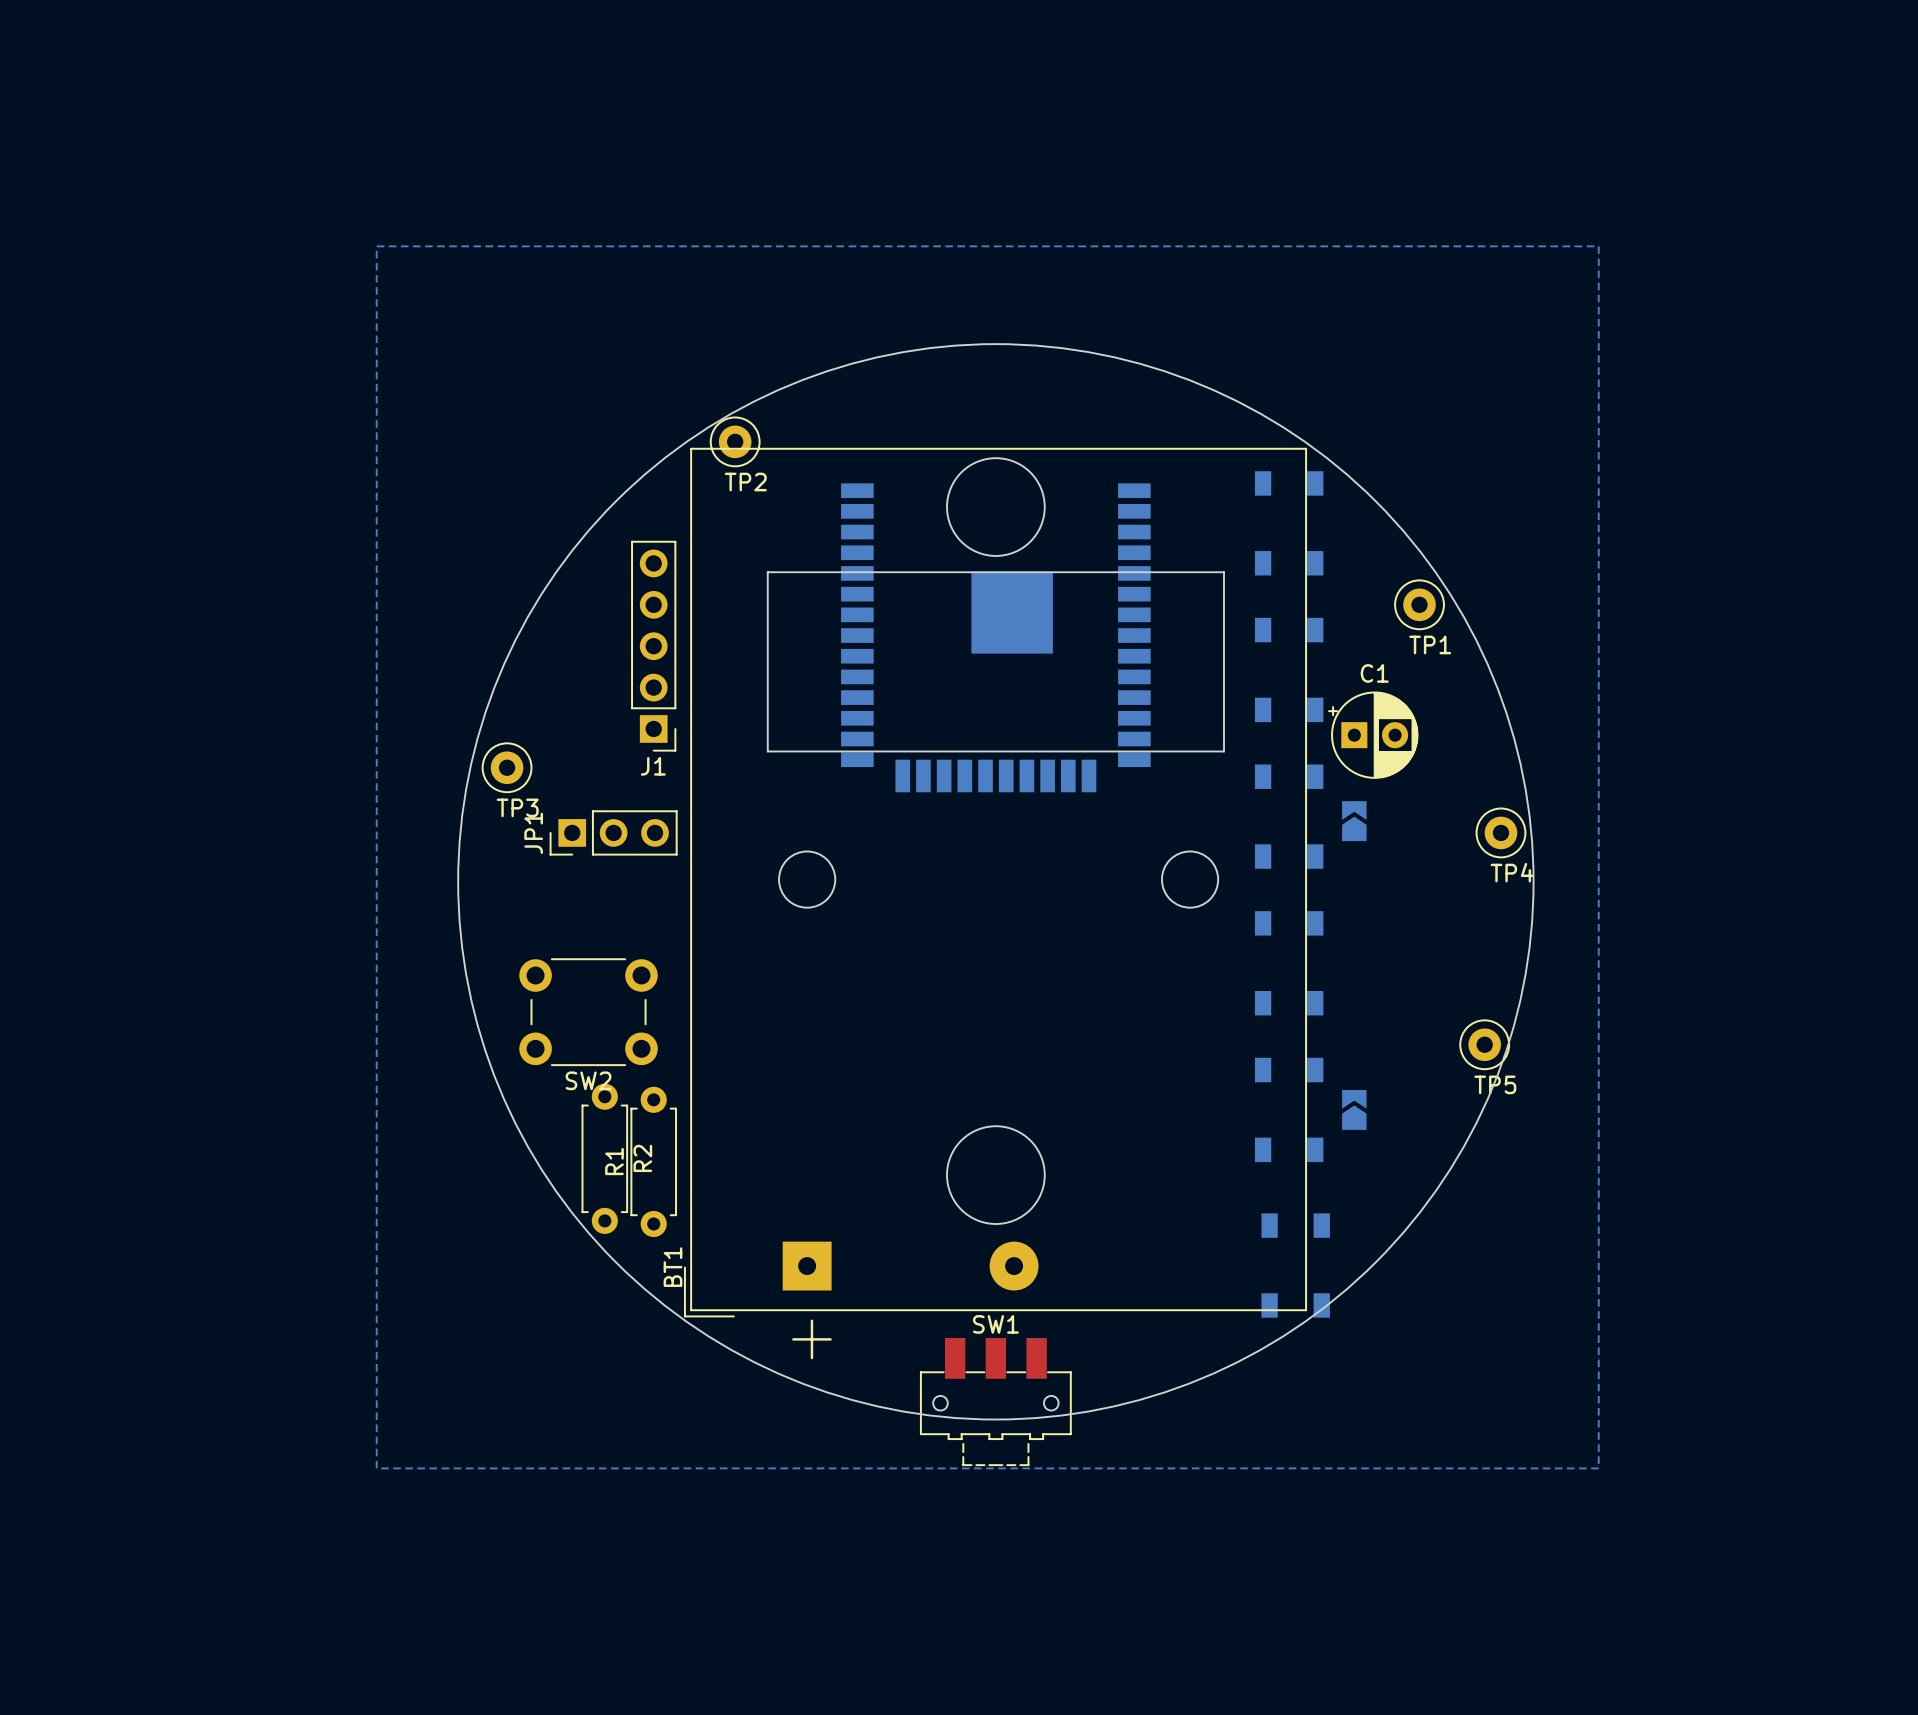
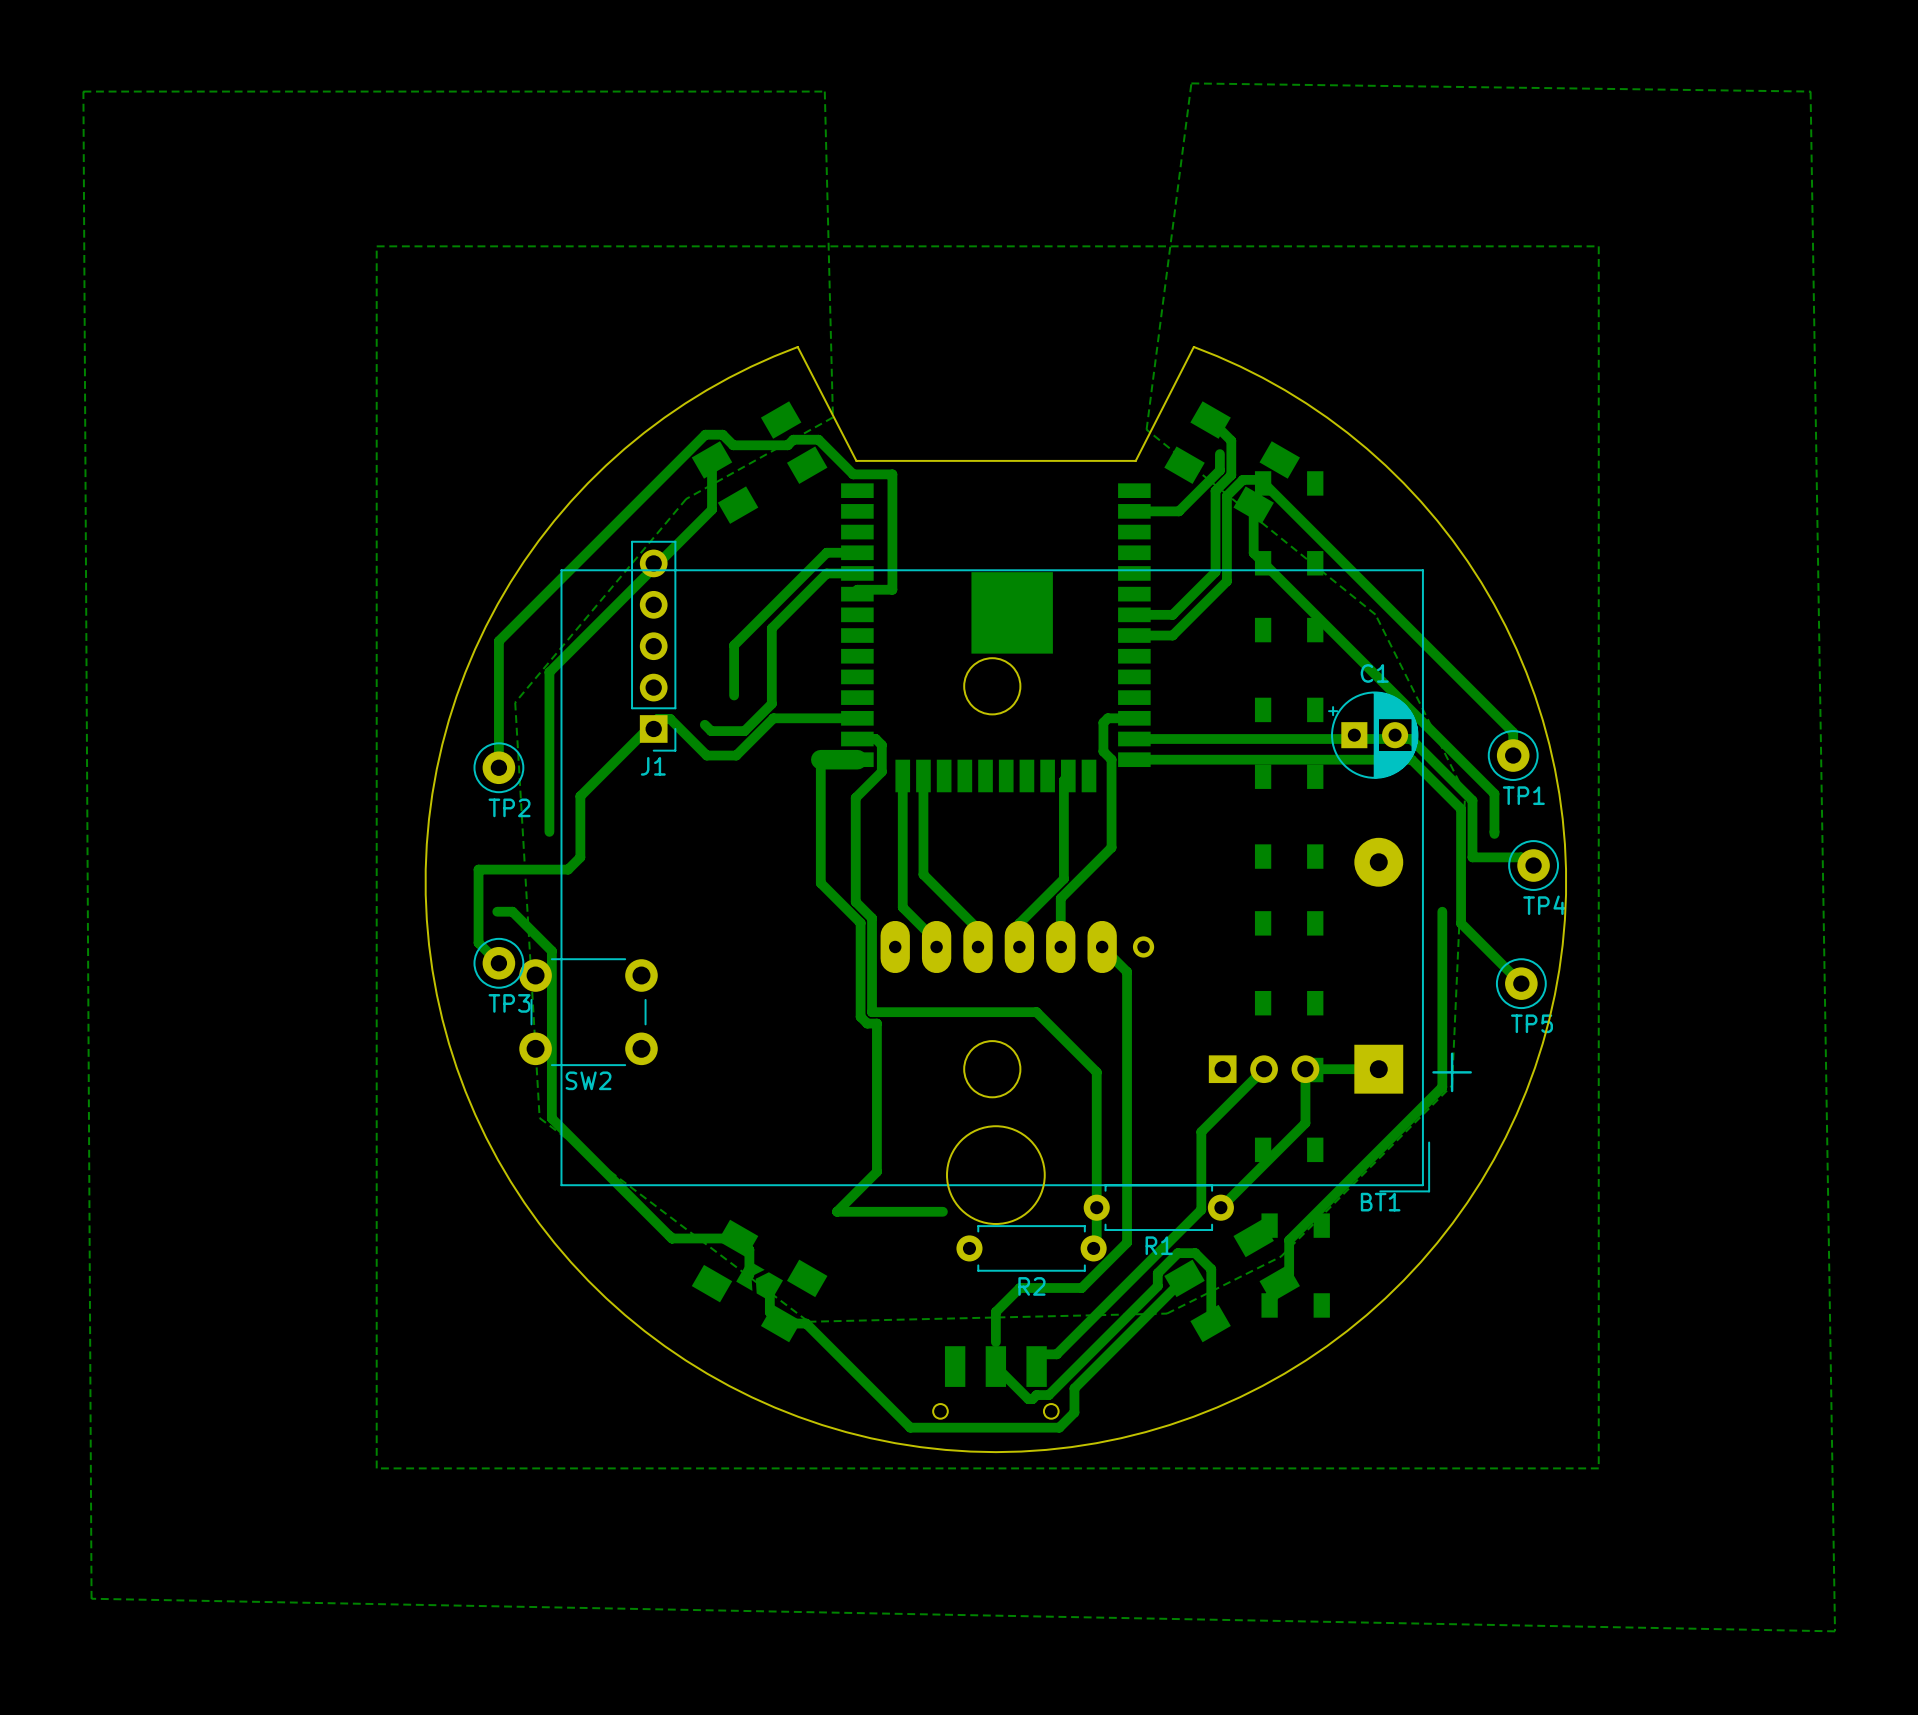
bottom zone outline: none -> (1191, 83) (1146, 429) (1375, 614) (1465, 793) (1452, 1085) (1281, 1256) (1166, 1313) (808, 1321) (539, 1118) (515, 702) (686, 498) (832, 417) (824, 91) (83, 91) (91, 1598) (1835, 1631) (1810, 91) (1191, 83)
round board edge: [457, 343, 1535, 1421] -> none
board edge: none -> (1193, 346) (1135, 460) (856, 460) (797, 347) (774, 356) (706, 390) (664, 417) (624, 448) (587, 483) (554, 520) (510, 582) (485, 626) (465, 672) (448, 720) (436, 769) (426, 844) (425, 894) (429, 945) (436, 994) (456, 1067) (475, 1114) (510, 1181) (539, 1223) (571, 1262) (606, 1298) (644, 1331) (707, 1373) (751, 1397) (798, 1416) (870, 1438) (920, 1447) (970, 1451) (1021, 1451) (1096, 1443) (1145, 1432) (1193, 1416) (1240, 1397) (1284, 1373) (1326, 1346) (1366, 1315) (1420, 1262) (1452, 1223) (1481, 1181) (1505, 1137) (1535, 1067) (1549, 1019) (1562, 944) (1566, 894) (1564, 844) (1554, 769) (1542, 720) (1526, 672) (1505, 626) (1481, 582) (1452, 540) (1420, 501) (1385, 465) (1327, 417) (1284, 390) (1240, 366) (1193, 346)
bottom track: none -> (1210, 420) (1231, 440) (1231, 475) (1215, 490) (1215, 571) (1172, 614) (1134, 614)
TP2 position: (735, 441) -> (498, 767)
bottom track: none -> (1219, 454) (1219, 470) (1178, 511) (1134, 511)
round board edge: [946, 457, 1046, 557] -> none
bottom track: none -> (712, 459) (712, 509) (549, 672) (549, 831)
part: none -> (759, 462)
part: none -> (1232, 462)
bottom track: none -> (1253, 505) (1253, 553) (1494, 793) (1494, 833)
bottom track: none -> (857, 552) (826, 552) (734, 645) (734, 695)
board edge: (767, 572) (1223, 572) (1223, 751) (767, 751) (767, 572) -> none
bottom track: none -> (857, 573) (826, 573) (771, 628) (771, 703) (744, 731) (711, 731) (704, 724)
bottom track: none -> (857, 594) (857, 589) (892, 589) (892, 474) (853, 474) (818, 439) (793, 439) (787, 445) (733, 445) (722, 434) (705, 434) (498, 641) (498, 767)
TP1 position: (1419, 604) -> (1513, 755)
bottom track: none -> (1134, 635) (1172, 635) (1226, 581) (1226, 495) (1242, 479) (1260, 479) (1513, 732) (1513, 755)
bottom track: none -> (857, 718) (773, 718) (736, 755) (706, 755) (670, 718) (657, 718) (580, 796) (580, 857) (568, 869) (478, 869) (478, 942) (498, 963)
bottom track: none -> (1134, 718) (1107, 718) (1103, 722) (1103, 751) (1111, 759) (1111, 847) (1060, 898) (1060, 946)
bottom track: none -> (857, 739) (875, 739) (881, 745) (881, 771) (855, 797) (855, 901) (872, 918) (872, 1012) (1036, 1012) (1096, 1072) (1096, 1245) (1093, 1248)
bottom track: none -> (1134, 739) (1410, 739) (1472, 800) (1472, 857) (1521, 857) (1533, 869) (1533, 873)
bottom track: none -> (857, 759) (820, 759) (820, 883) (860, 922) (860, 1016) (867, 1023) (876, 1023) (876, 1171) (837, 1211) (942, 1211)
bottom track: none -> (1134, 759) (1411, 759) (1461, 809) (1461, 923) (1521, 983)
TP3 position: (507, 767) -> (498, 963)
bottom track: none -> (902, 775) (902, 907) (936, 941) (936, 946)
bottom track: none -> (923, 775) (923, 874) (977, 929) (977, 946)
bottom track: none -> (1068, 775) (1063, 780) (1063, 878) (1019, 923) (1019, 946)
part: (1354, 821) -> none
JP1: (613, 832) -> none
TP4 position: (1500, 832) -> (1533, 865)
BT1 rotation: 0° (995, 882) -> 90° counterclockwise (995, 880)
bottom track: none -> (497, 911) (512, 911) (551, 951) (551, 1118) (671, 1238) (738, 1238) (749, 1249) (749, 1275)
bottom track: none -> (1442, 911) (1442, 1087) (1289, 1240) (1289, 1274) (1279, 1283)
part: none -> (1017, 946)
bottom track: none -> (1102, 946) (1127, 971) (1127, 1242) (1081, 1288) (1019, 1288) (995, 1311) (995, 1342)
TP5 position: (1484, 1044) -> (1521, 983)
bottom track: none -> (1264, 1069) (1201, 1131) (1201, 1209) (1056, 1354) (1036, 1354)
part: none -> (1264, 1069)
bottom track: none -> (1378, 1069) (1305, 1069) (1305, 1123) (1220, 1207)
part: (1354, 1109) -> none
R2 rotation: 0° (604, 1158) -> 90° clockwise (1031, 1248)
R2 position: (604, 1158) -> (1031, 1248)
R1 name position: R1 (614, 1161) -> R1 (1159, 1245)
R1 rotation: 0° (653, 1161) -> 90° clockwise (1158, 1207)
R1 position: (653, 1161) -> (1158, 1207)
bottom track: none -> (1184, 1278) (1074, 1388) (1074, 1412) (1059, 1427) (910, 1427) (806, 1323) (781, 1323) (769, 1312) (769, 1286)
part: none -> (759, 1281)
part: none -> (759, 1281)
part: none -> (1232, 1281)
bottom track: none -> (1210, 1323) (1211, 1269) (1195, 1253) (1177, 1253) (1157, 1273) (1157, 1286) (1048, 1395) (1036, 1395) (1032, 1399) (1028, 1399) (995, 1366)
SW1 side: top (995, 1402) -> bottom (995, 1382)

